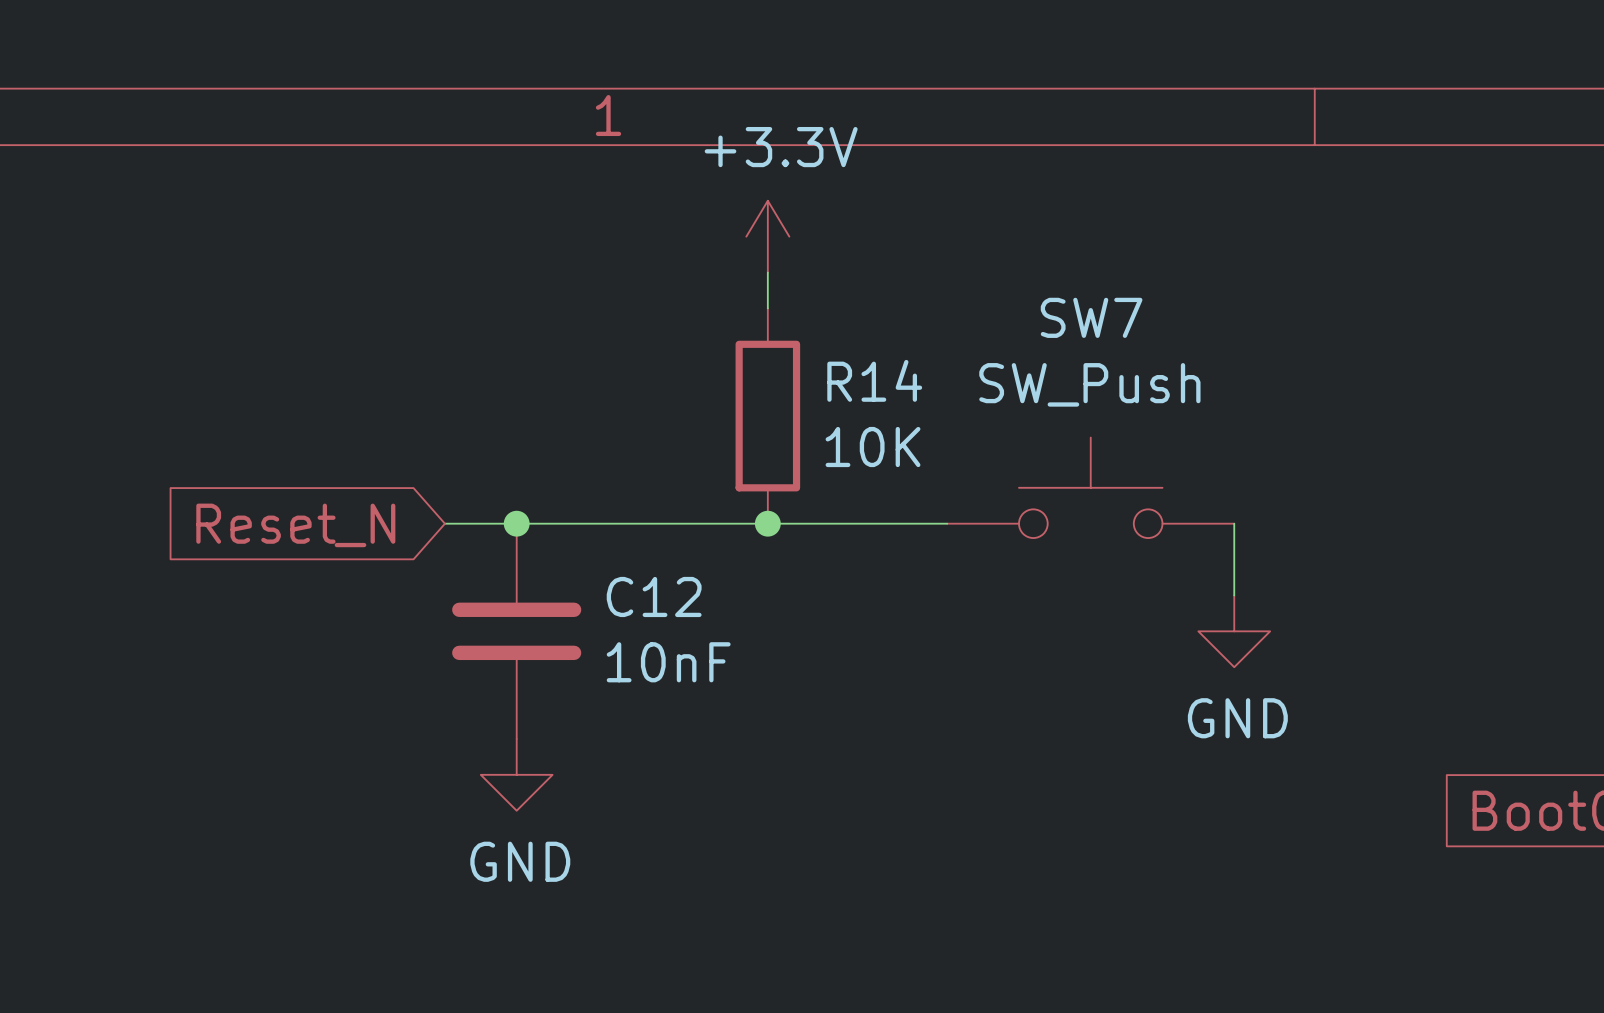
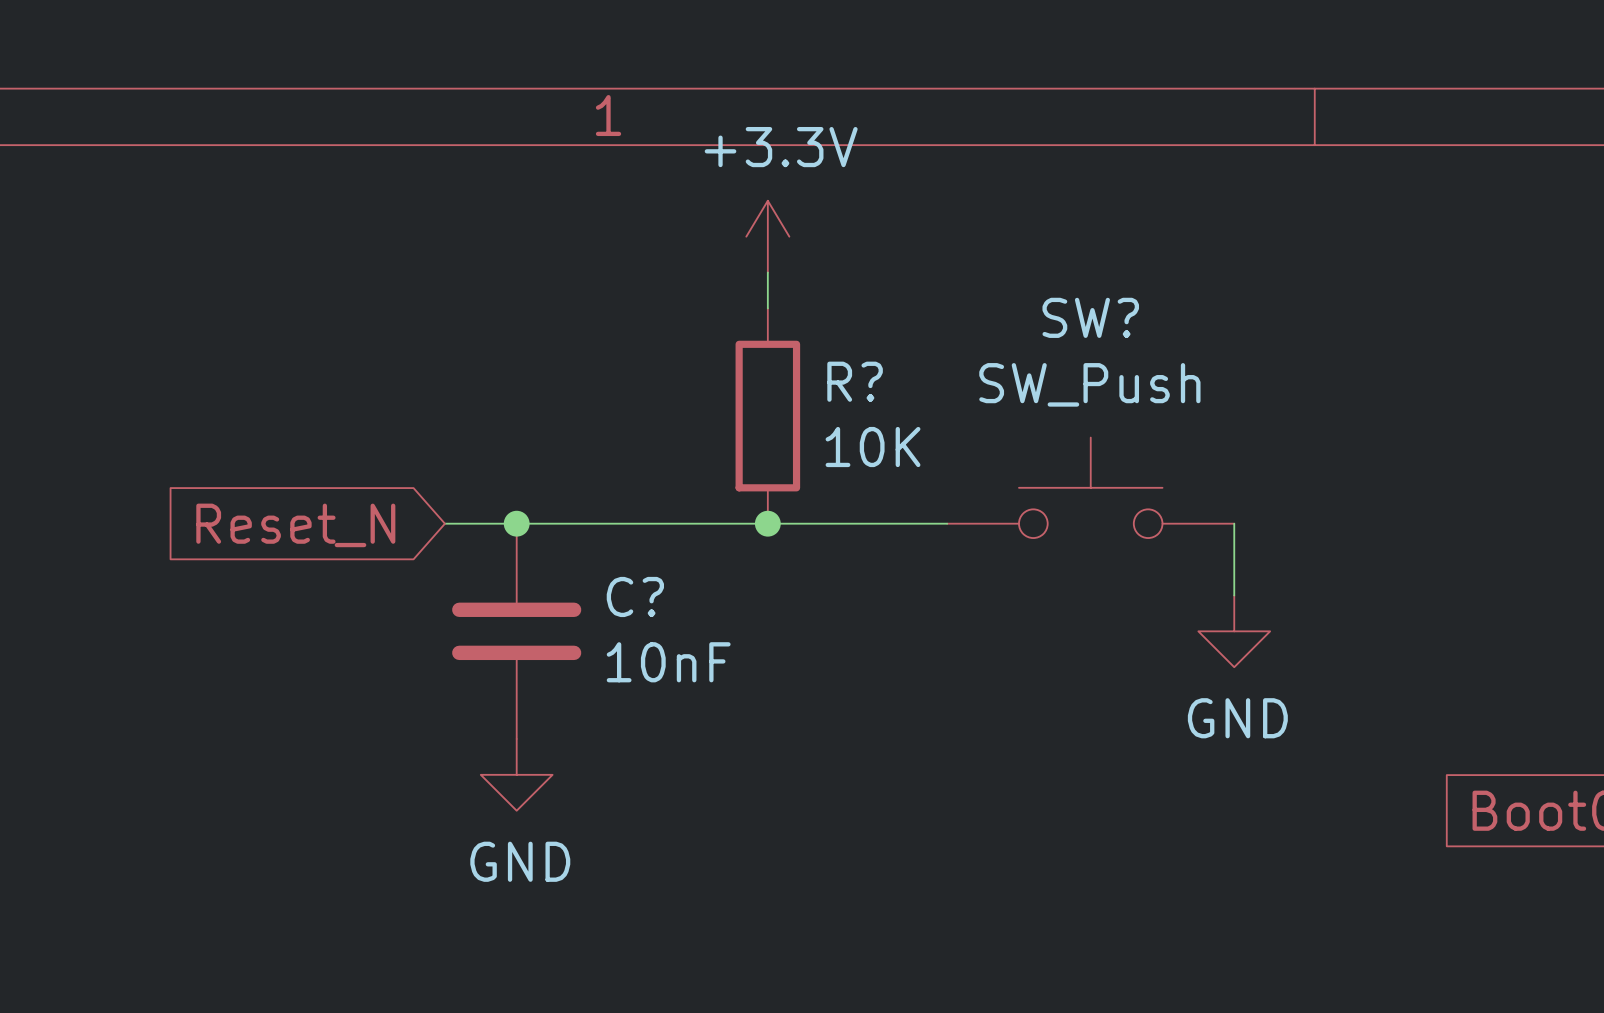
SW7 name: SW7 (1091, 317) -> SW? (1090, 317)
R14 name: R14 (874, 380) -> R? (855, 381)
C12 name: C12 (654, 596) -> C? (635, 596)

